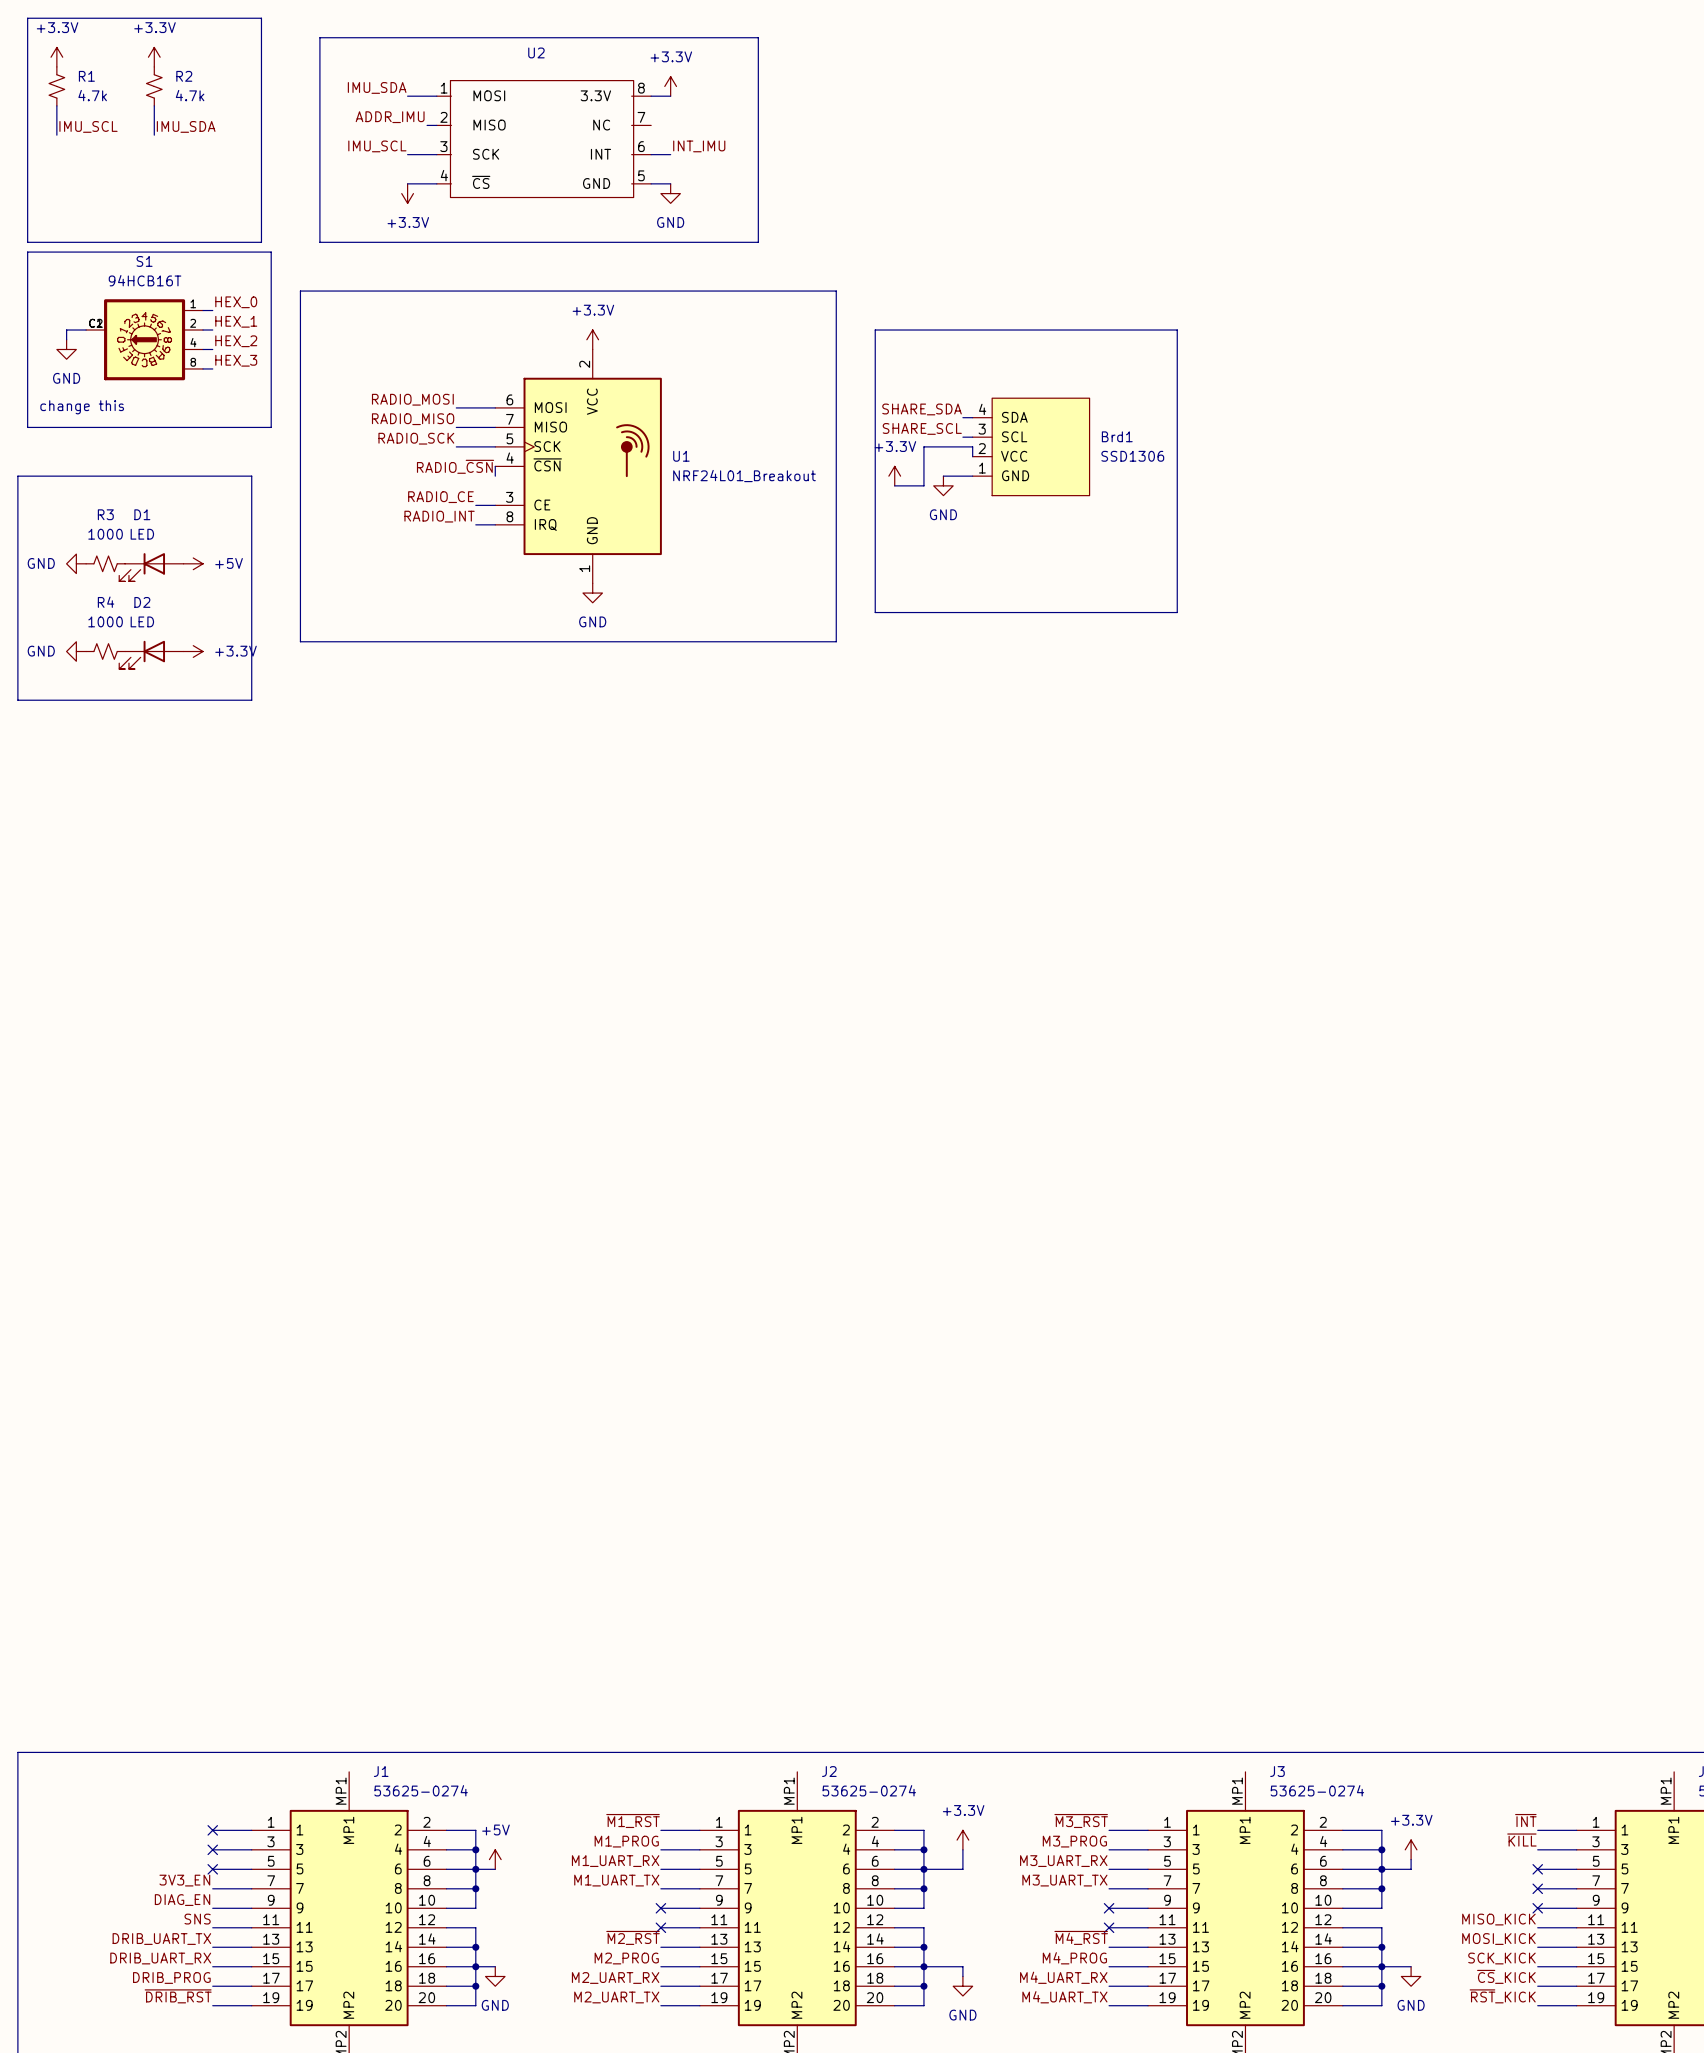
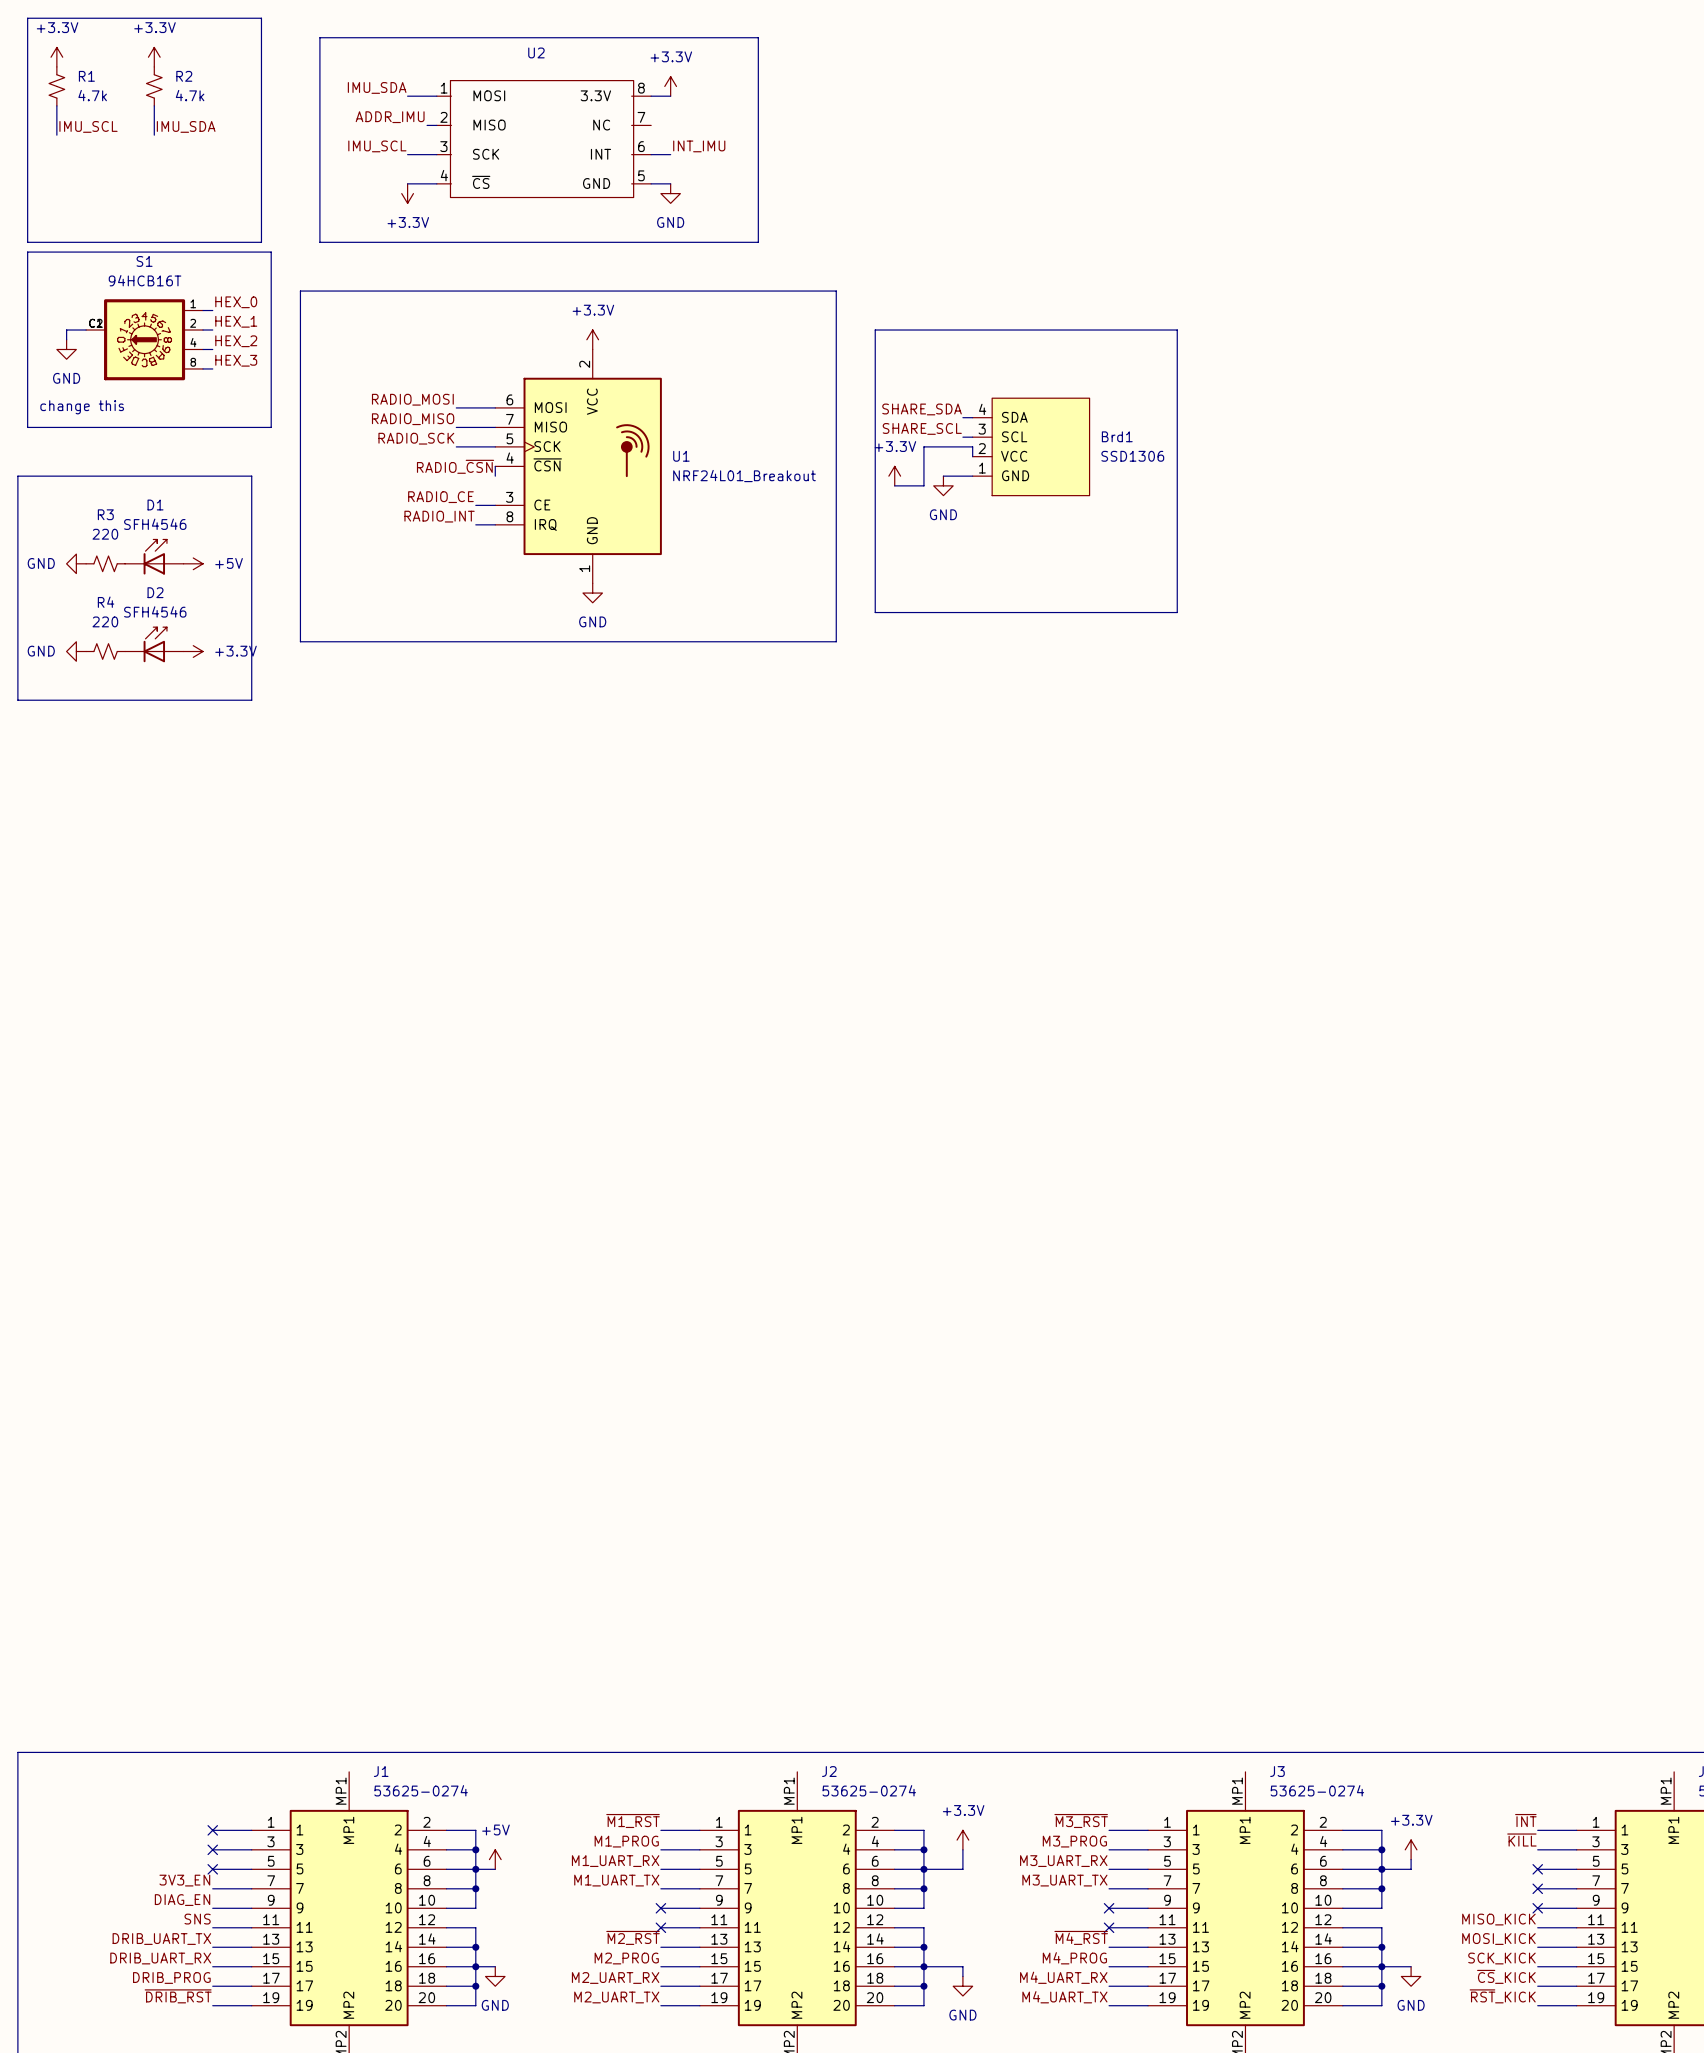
R3 value: 1000 (105, 534) -> 220 (105, 534)
D1 value: LED (142, 534) -> SFH4546 (155, 524)
D1 symbol: [119, 553, 184, 582] -> [125, 539, 184, 575]
R4 value: 1000 (105, 621) -> 220 (105, 621)
D2 value: LED (142, 621) -> SFH4546 (155, 611)
D2 symbol: [119, 640, 184, 670] -> [125, 627, 184, 663]

